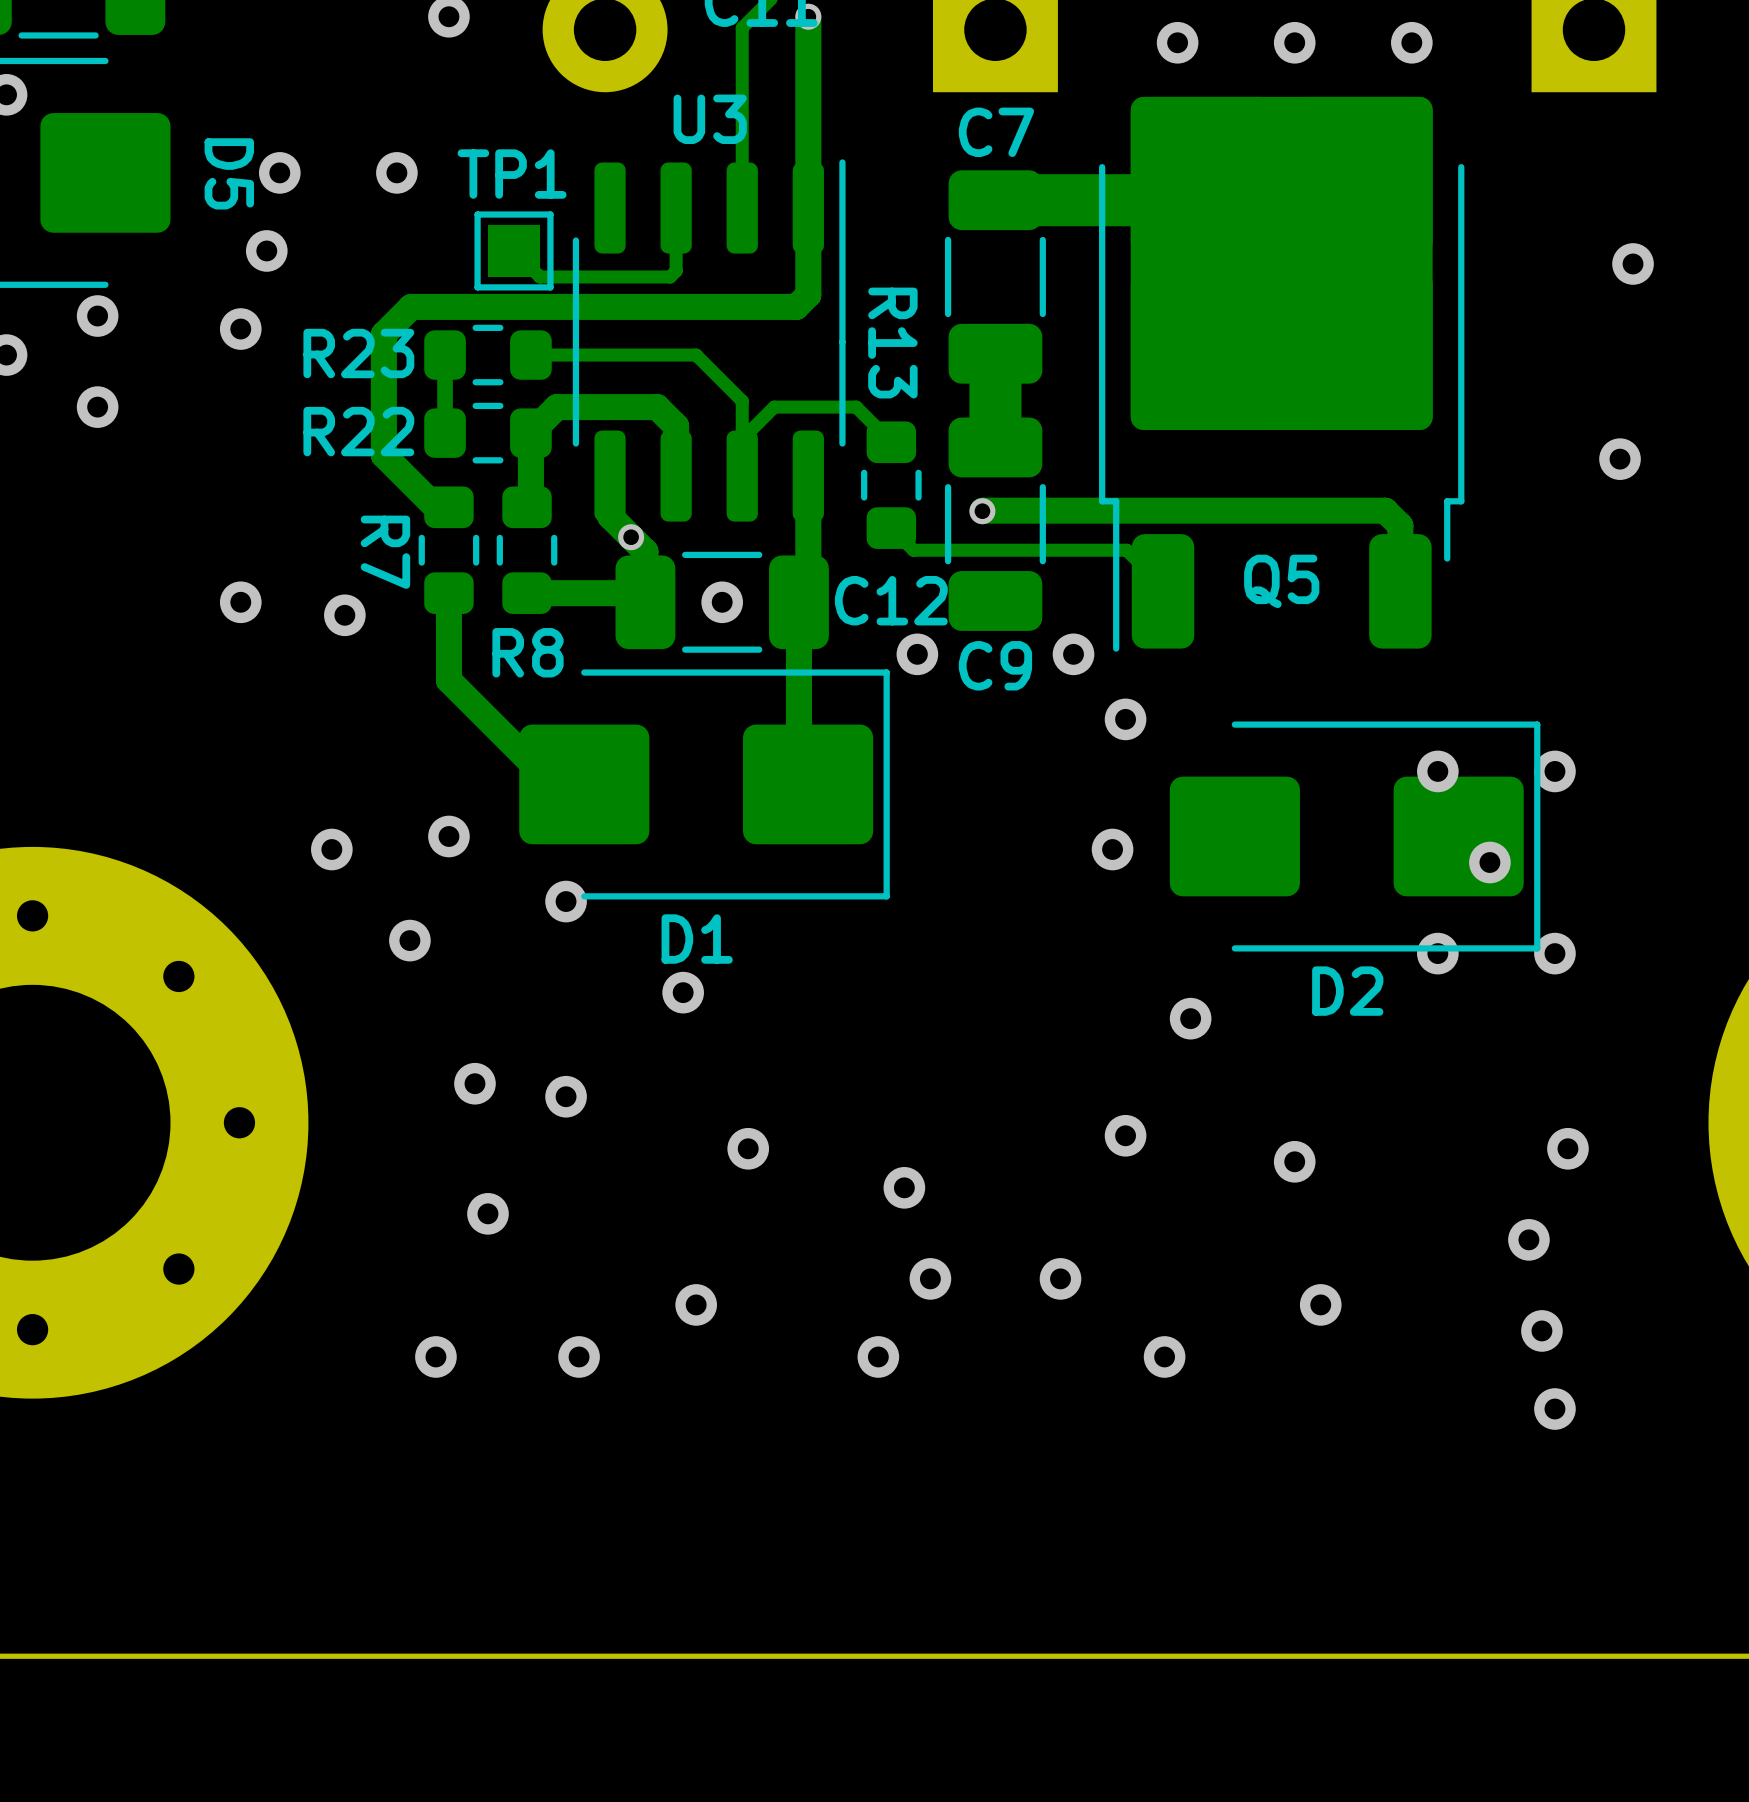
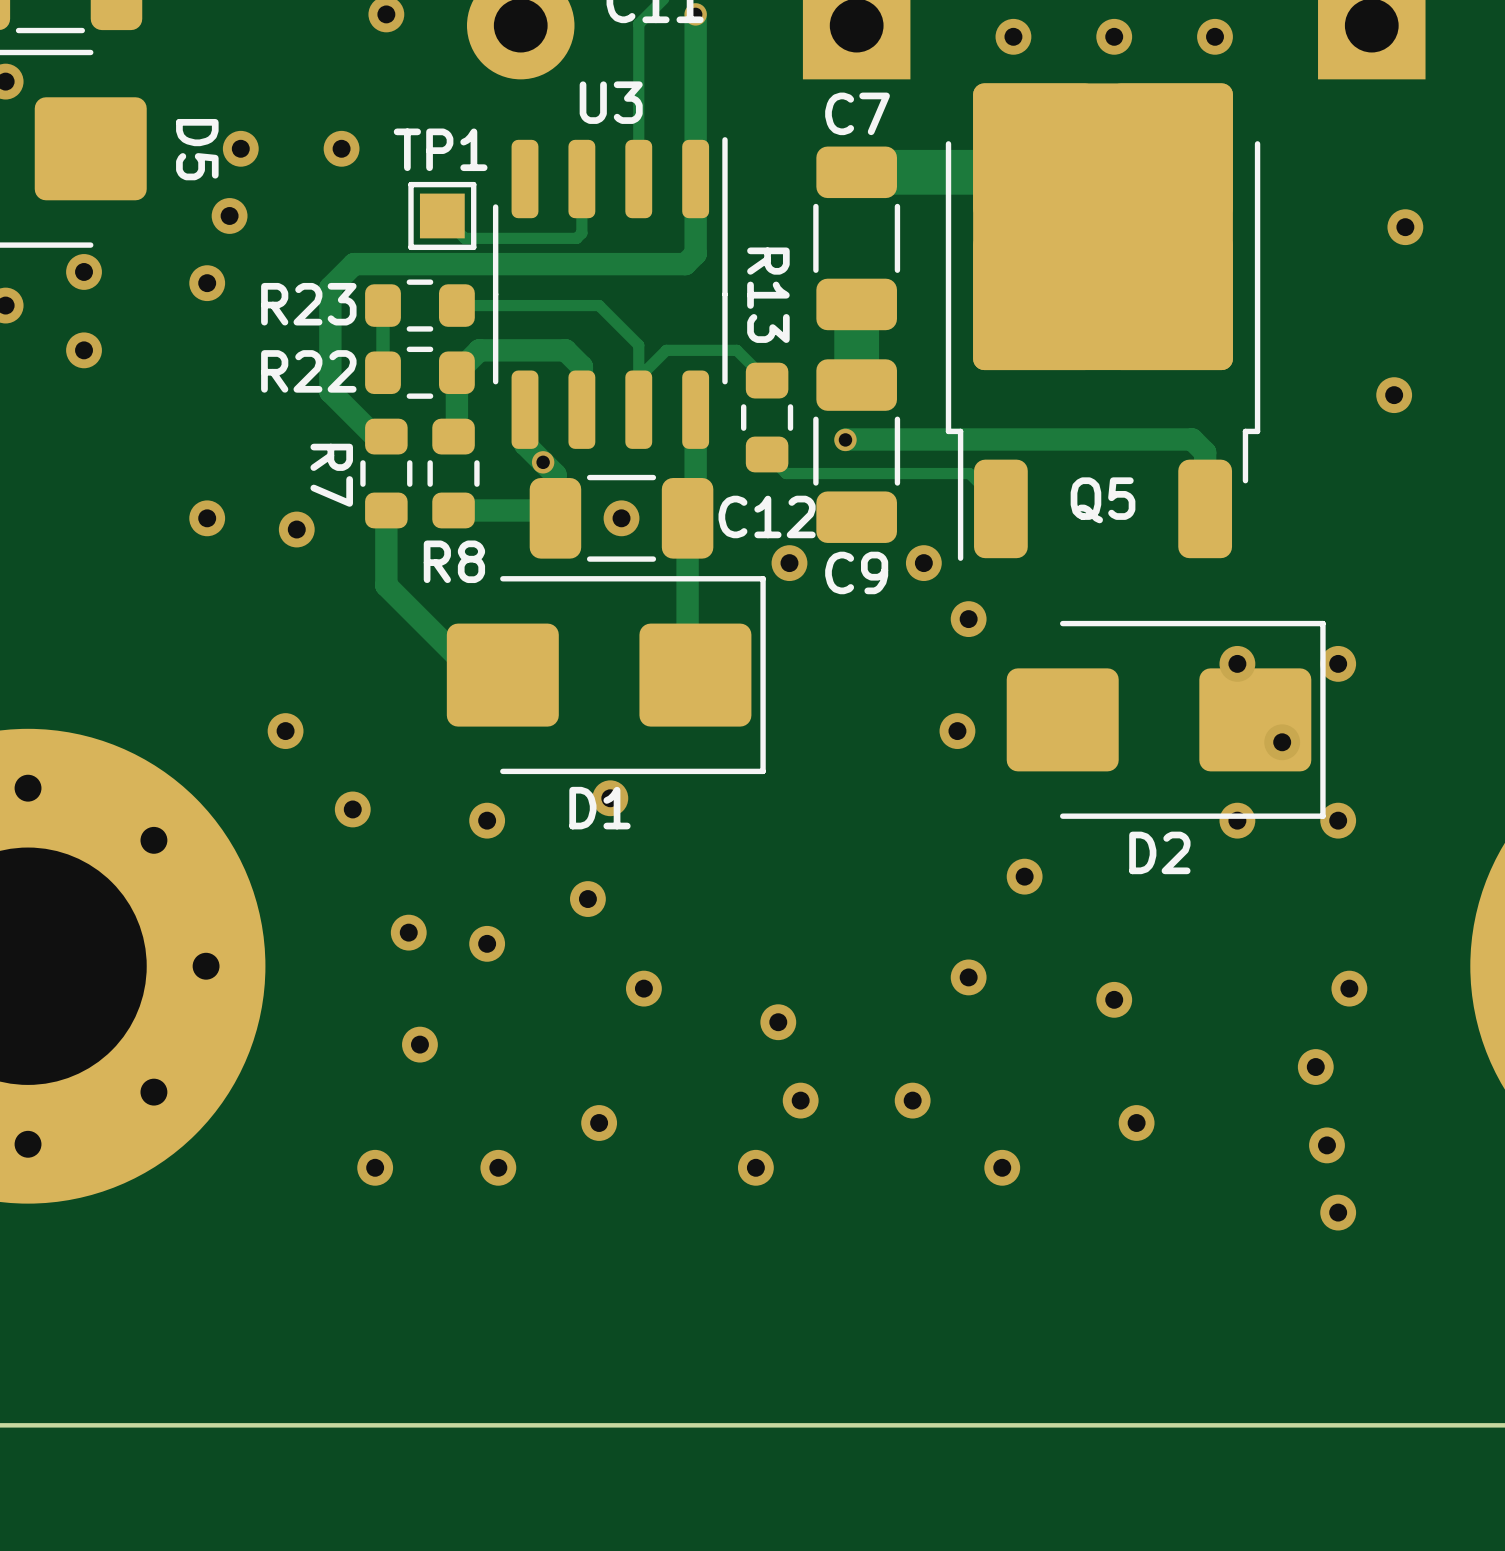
via: (448, 836) -> none
via position: (566, 901) -> (487, 820)
via: none -> (610, 798)
via: (683, 992) -> none
via: none -> (587, 899)

